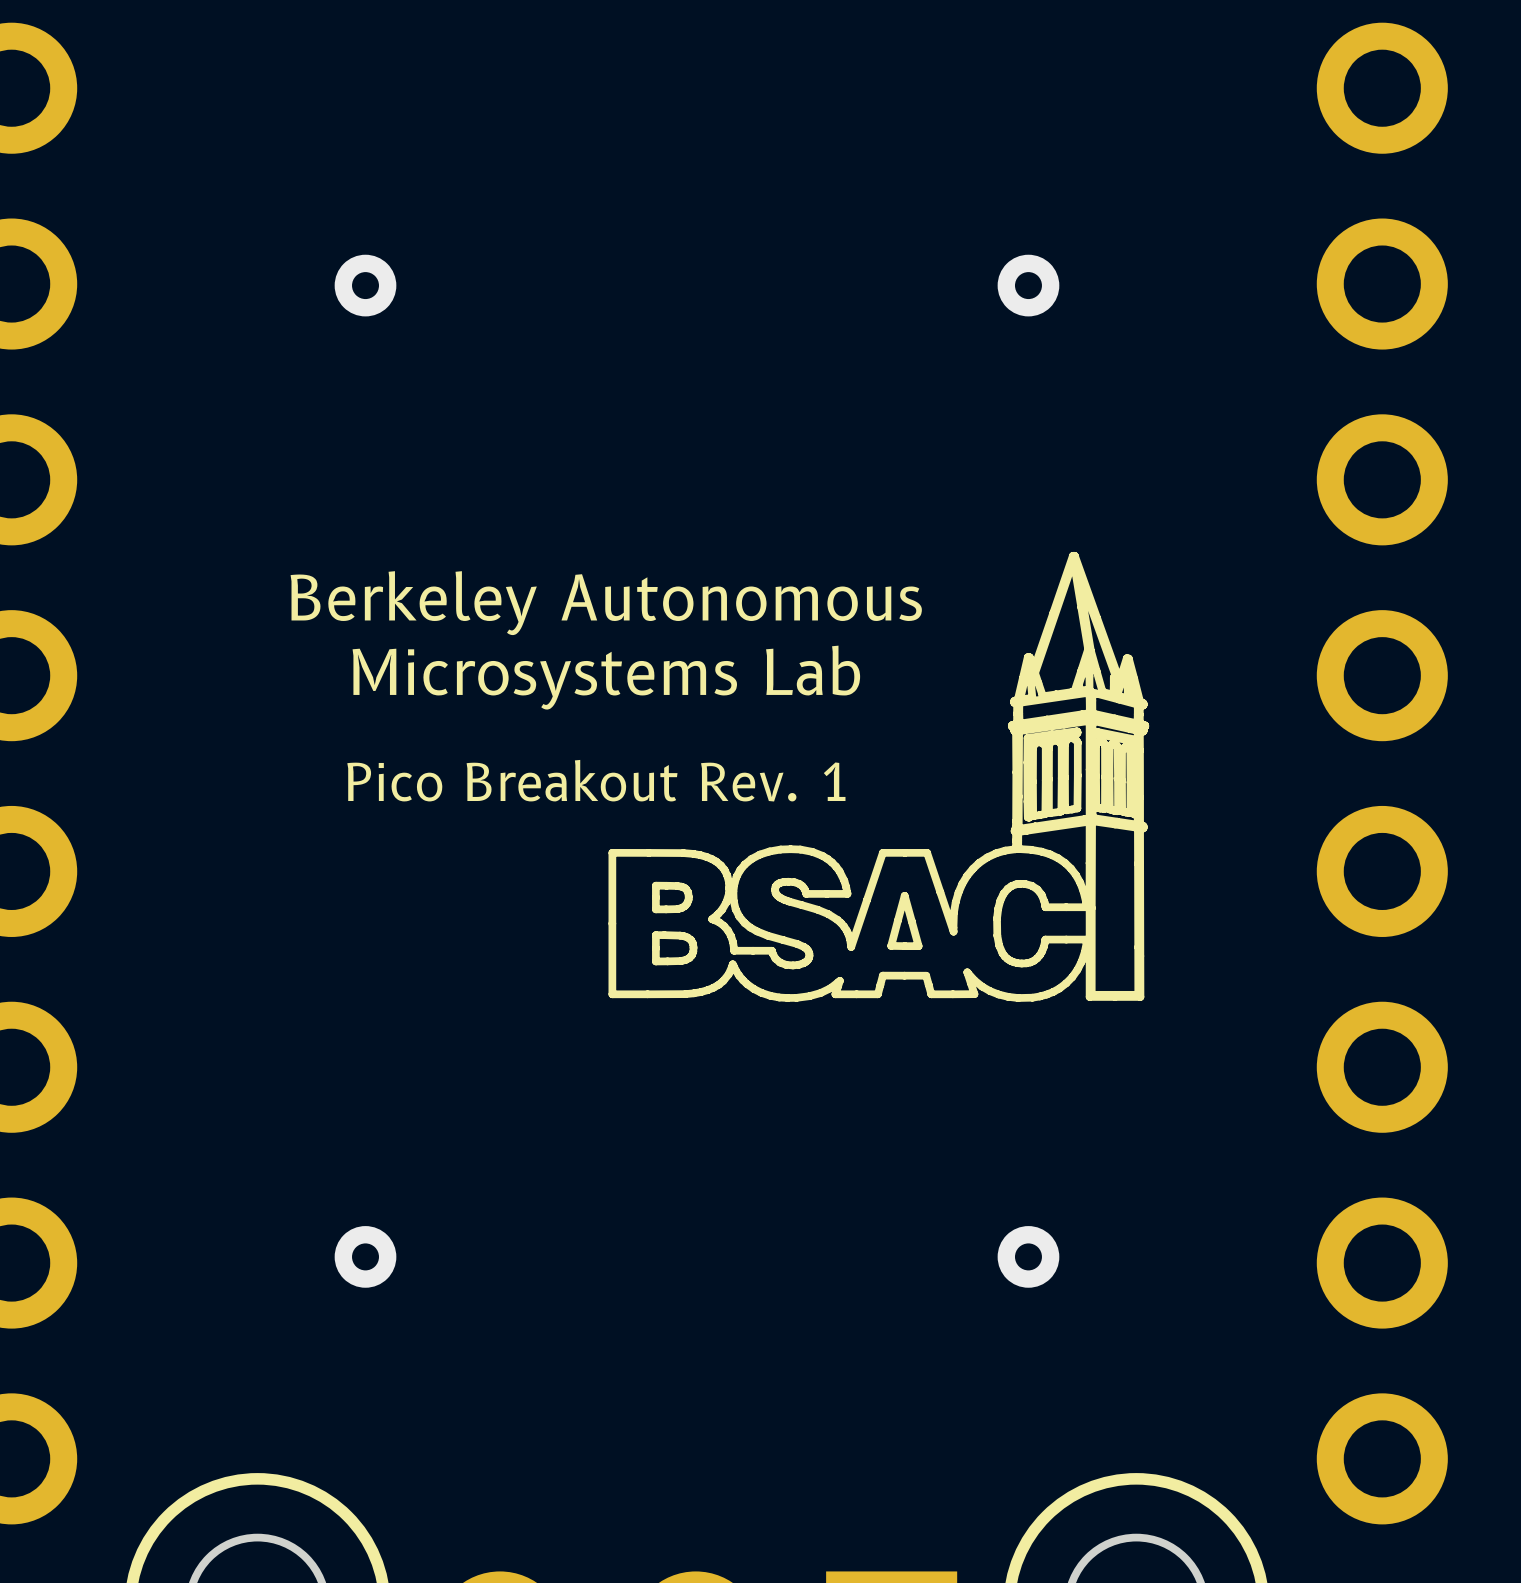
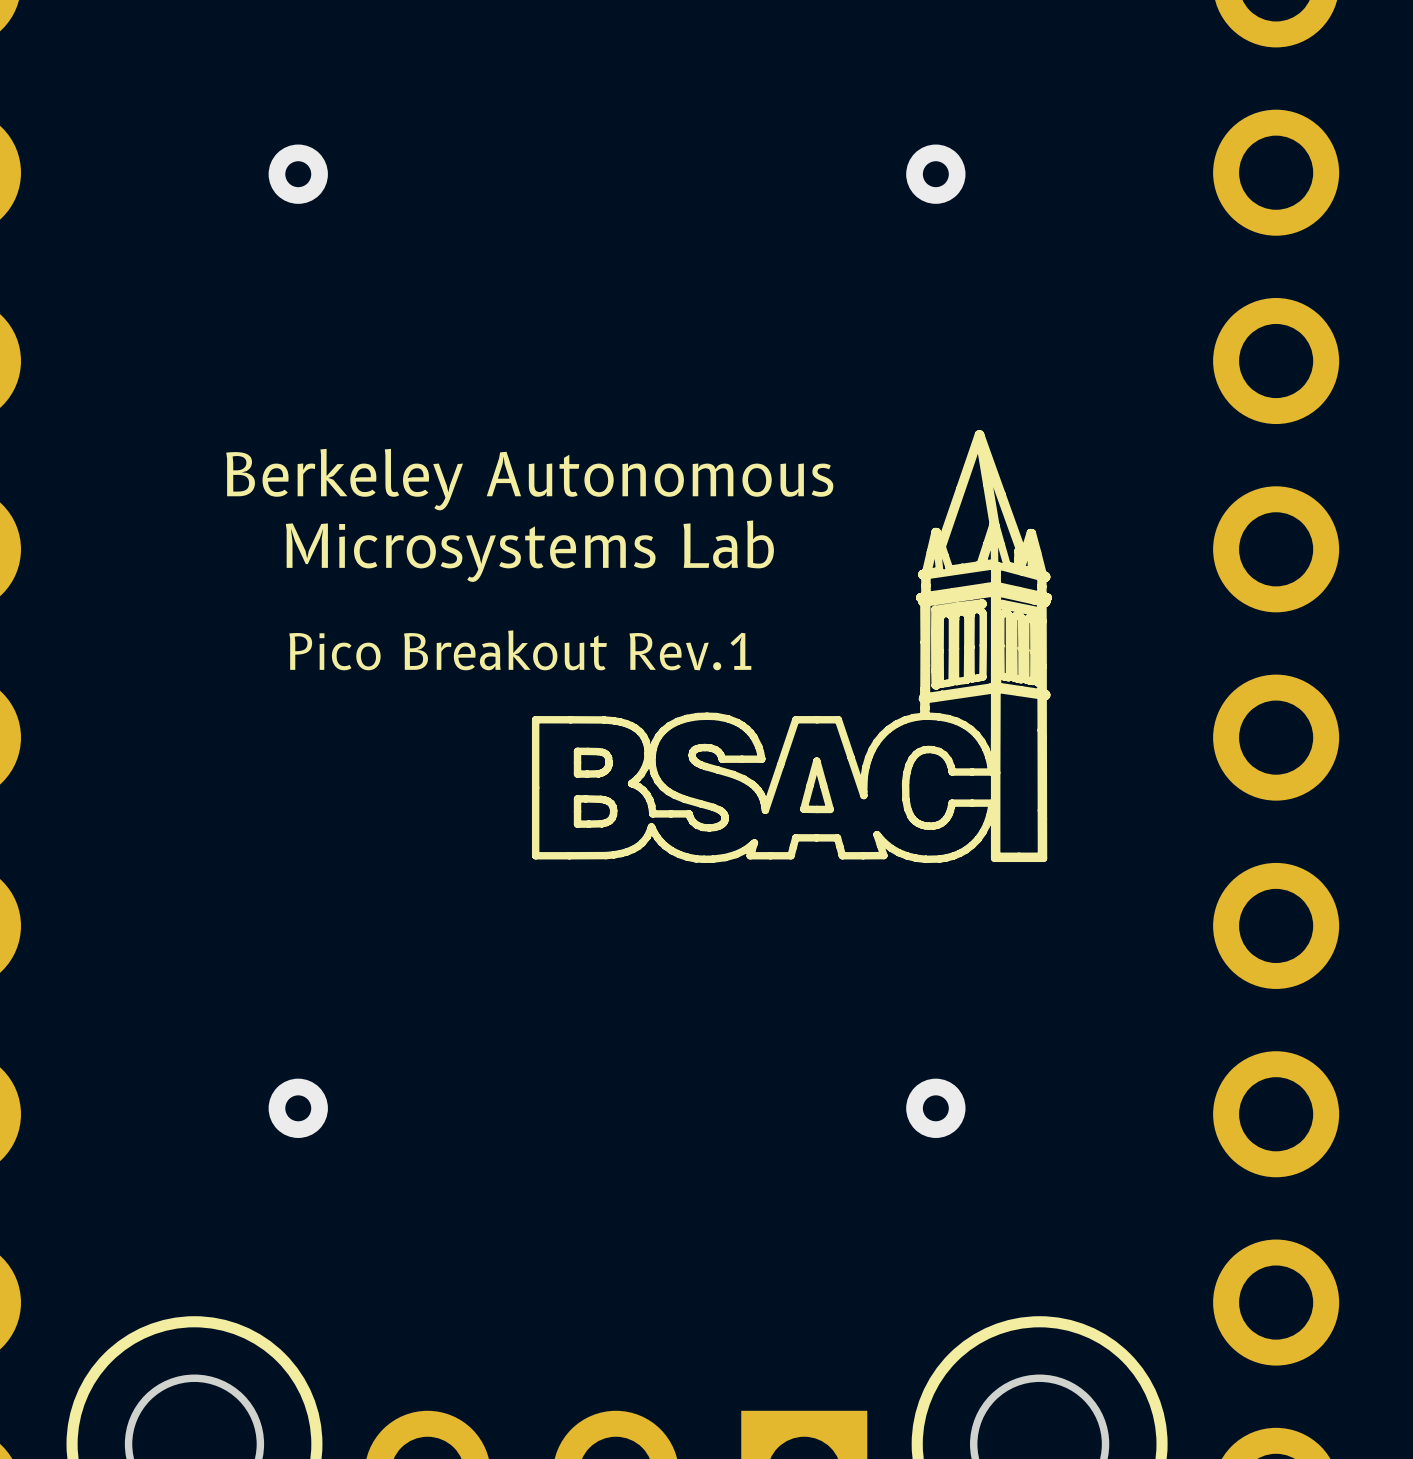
text: Pico Breakout Rev. 1 (596, 780) -> Pico Breakout Rev.1 (520, 650)

